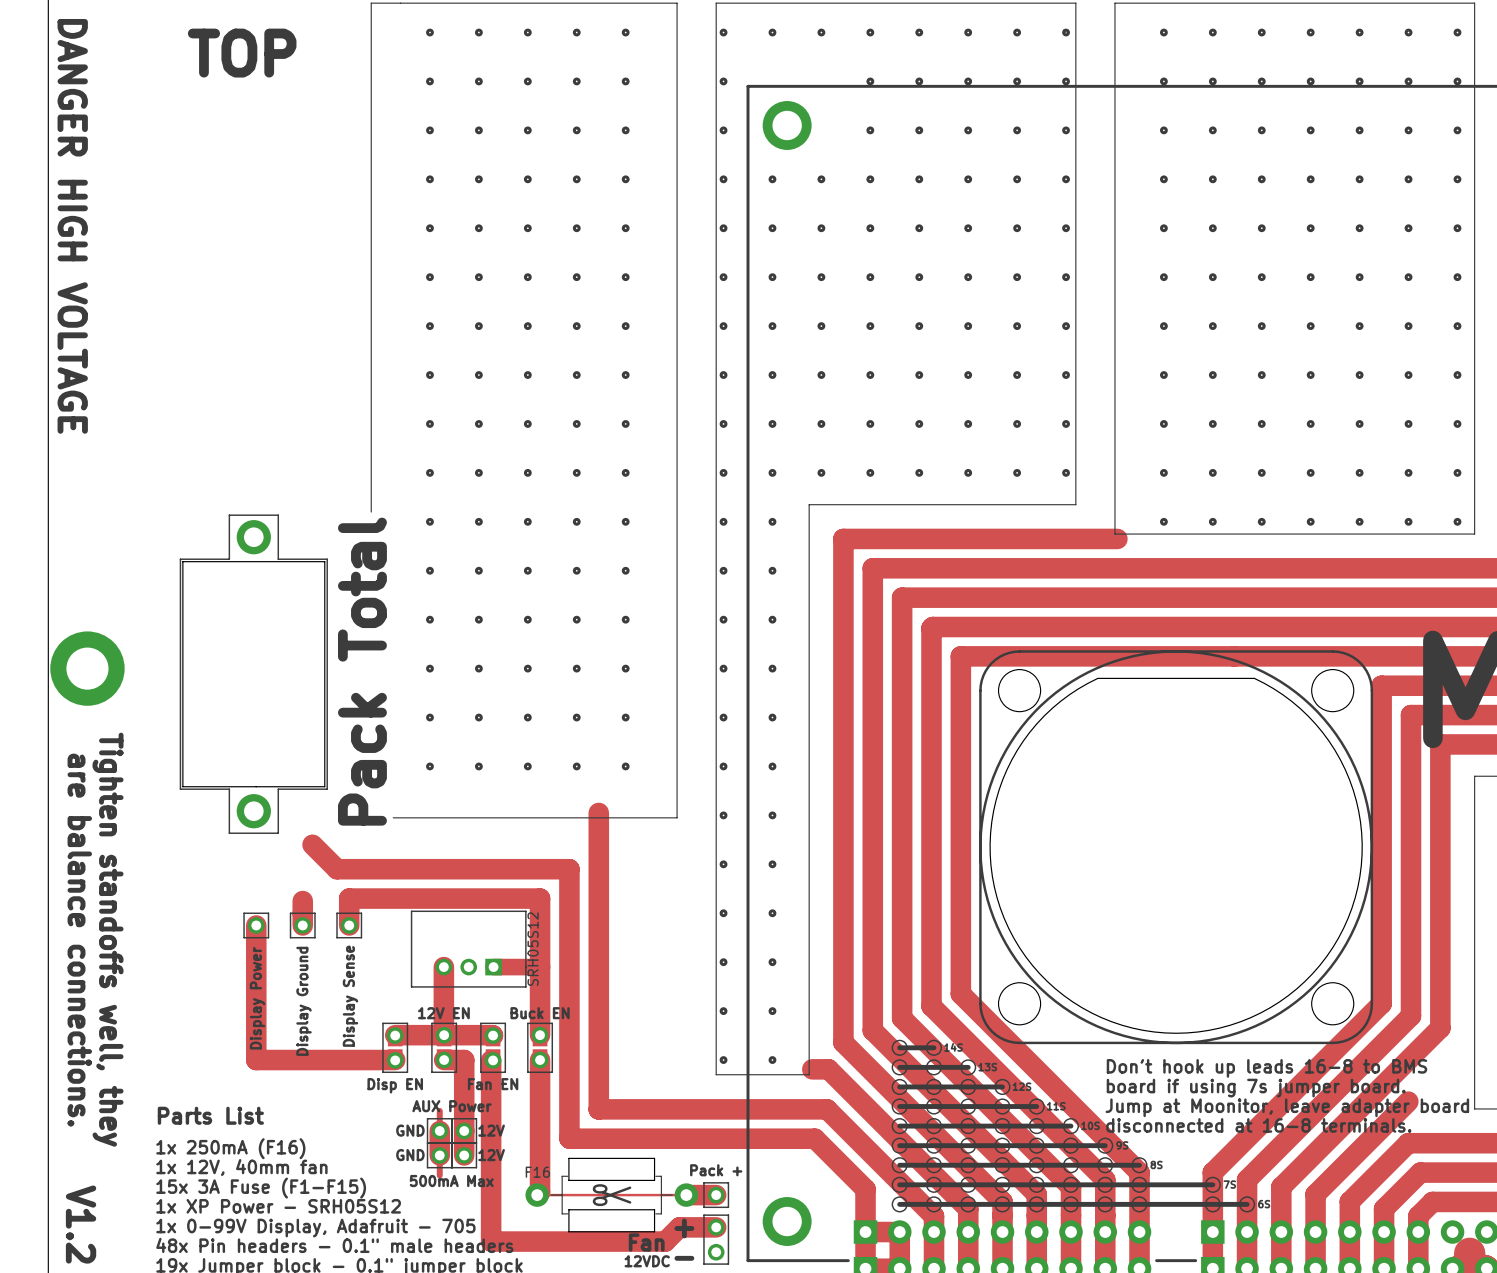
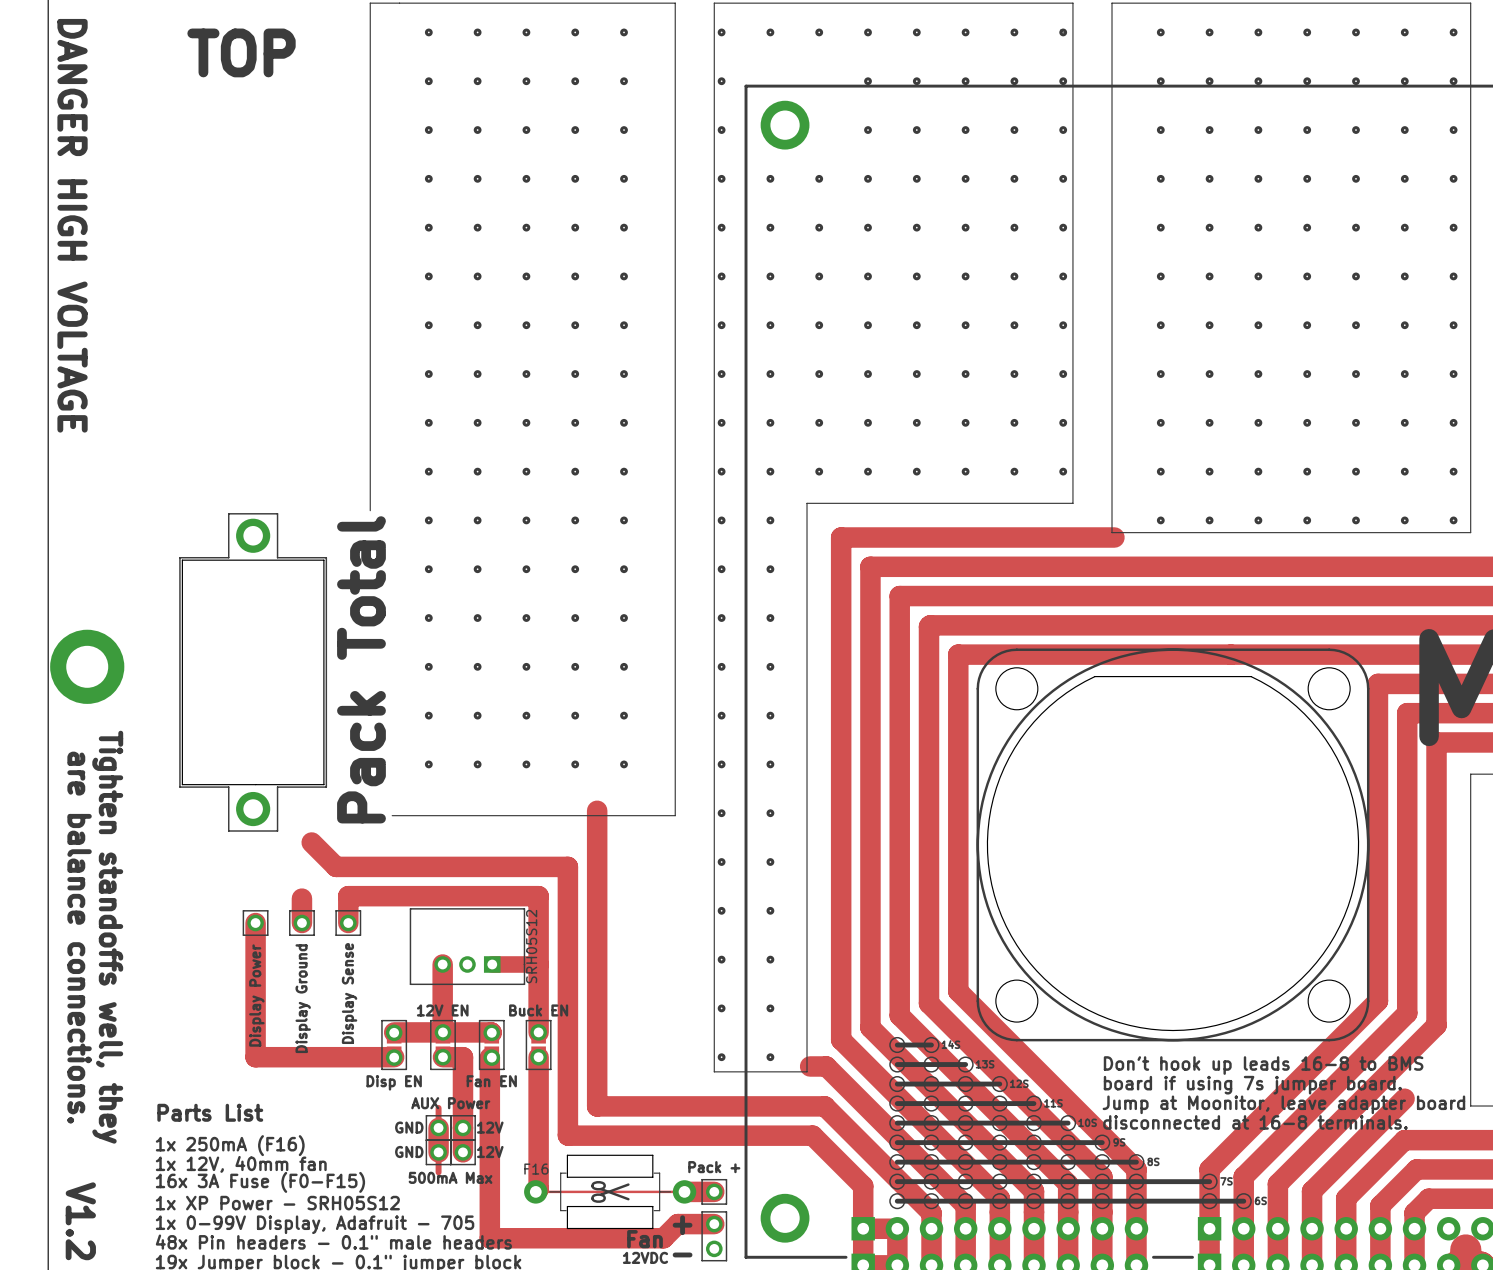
text: 15x 3A Fuse (F1-F15) (261, 1188) -> 16x 3A Fuse (F0-F15) (260, 1182)

